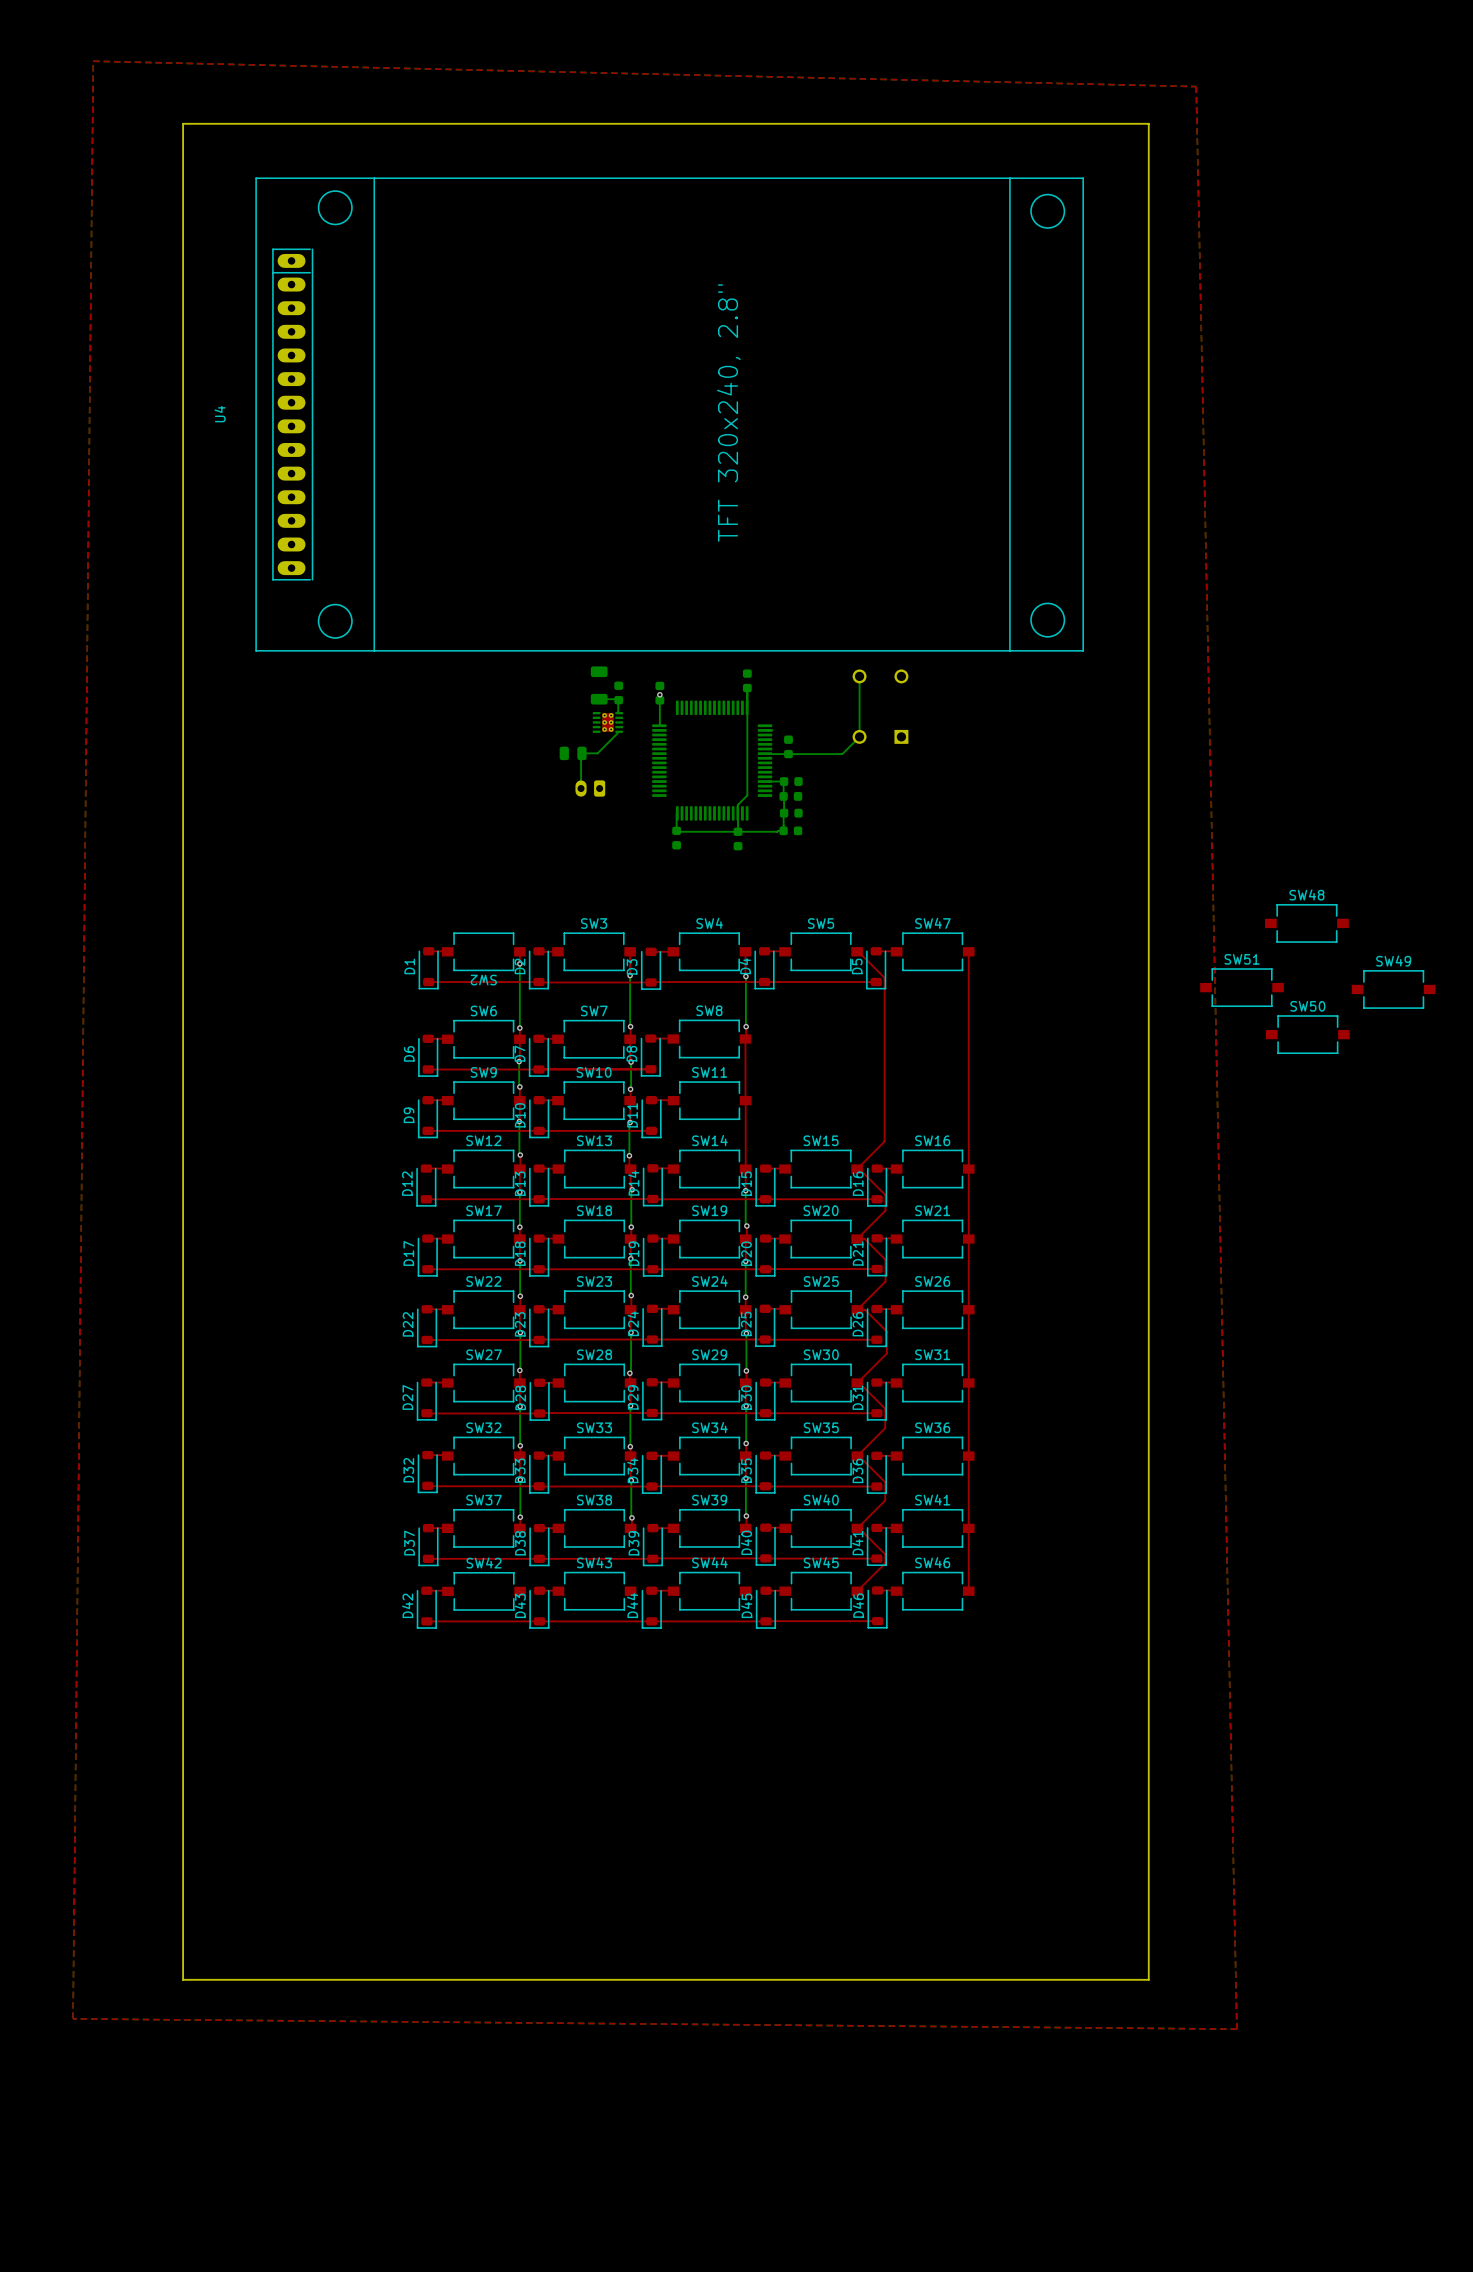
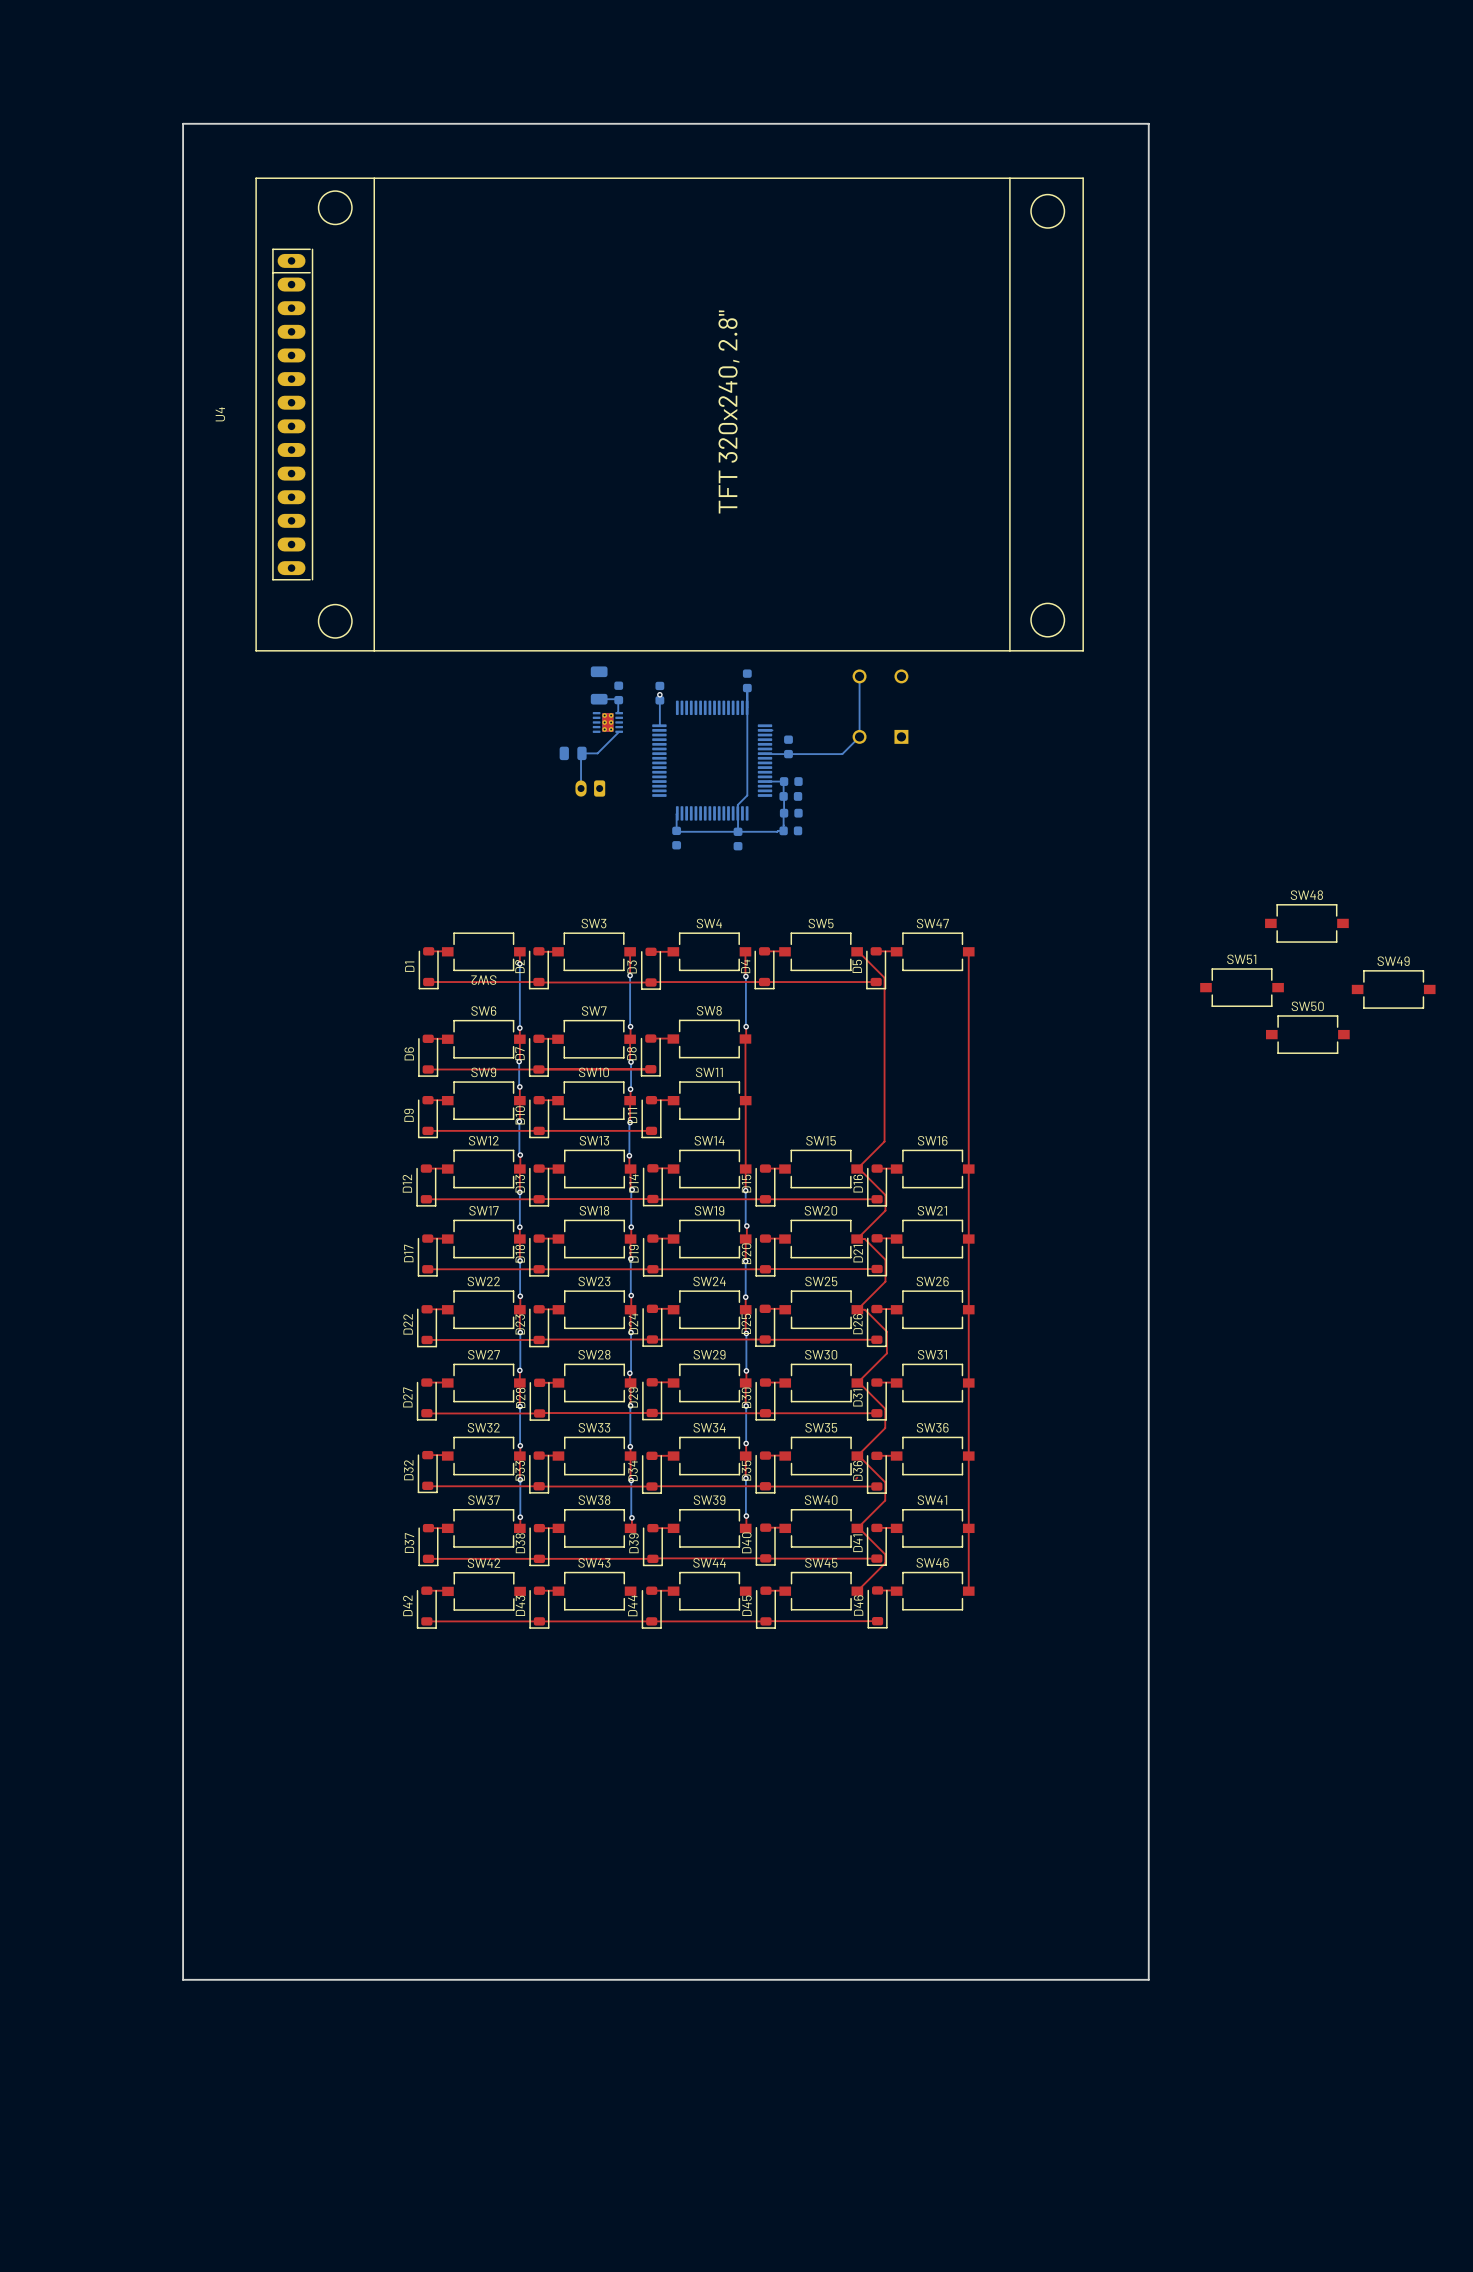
top zone outline: (93, 61) (1196, 86) (1236, 2029) (73, 2018) (93, 61) -> none

